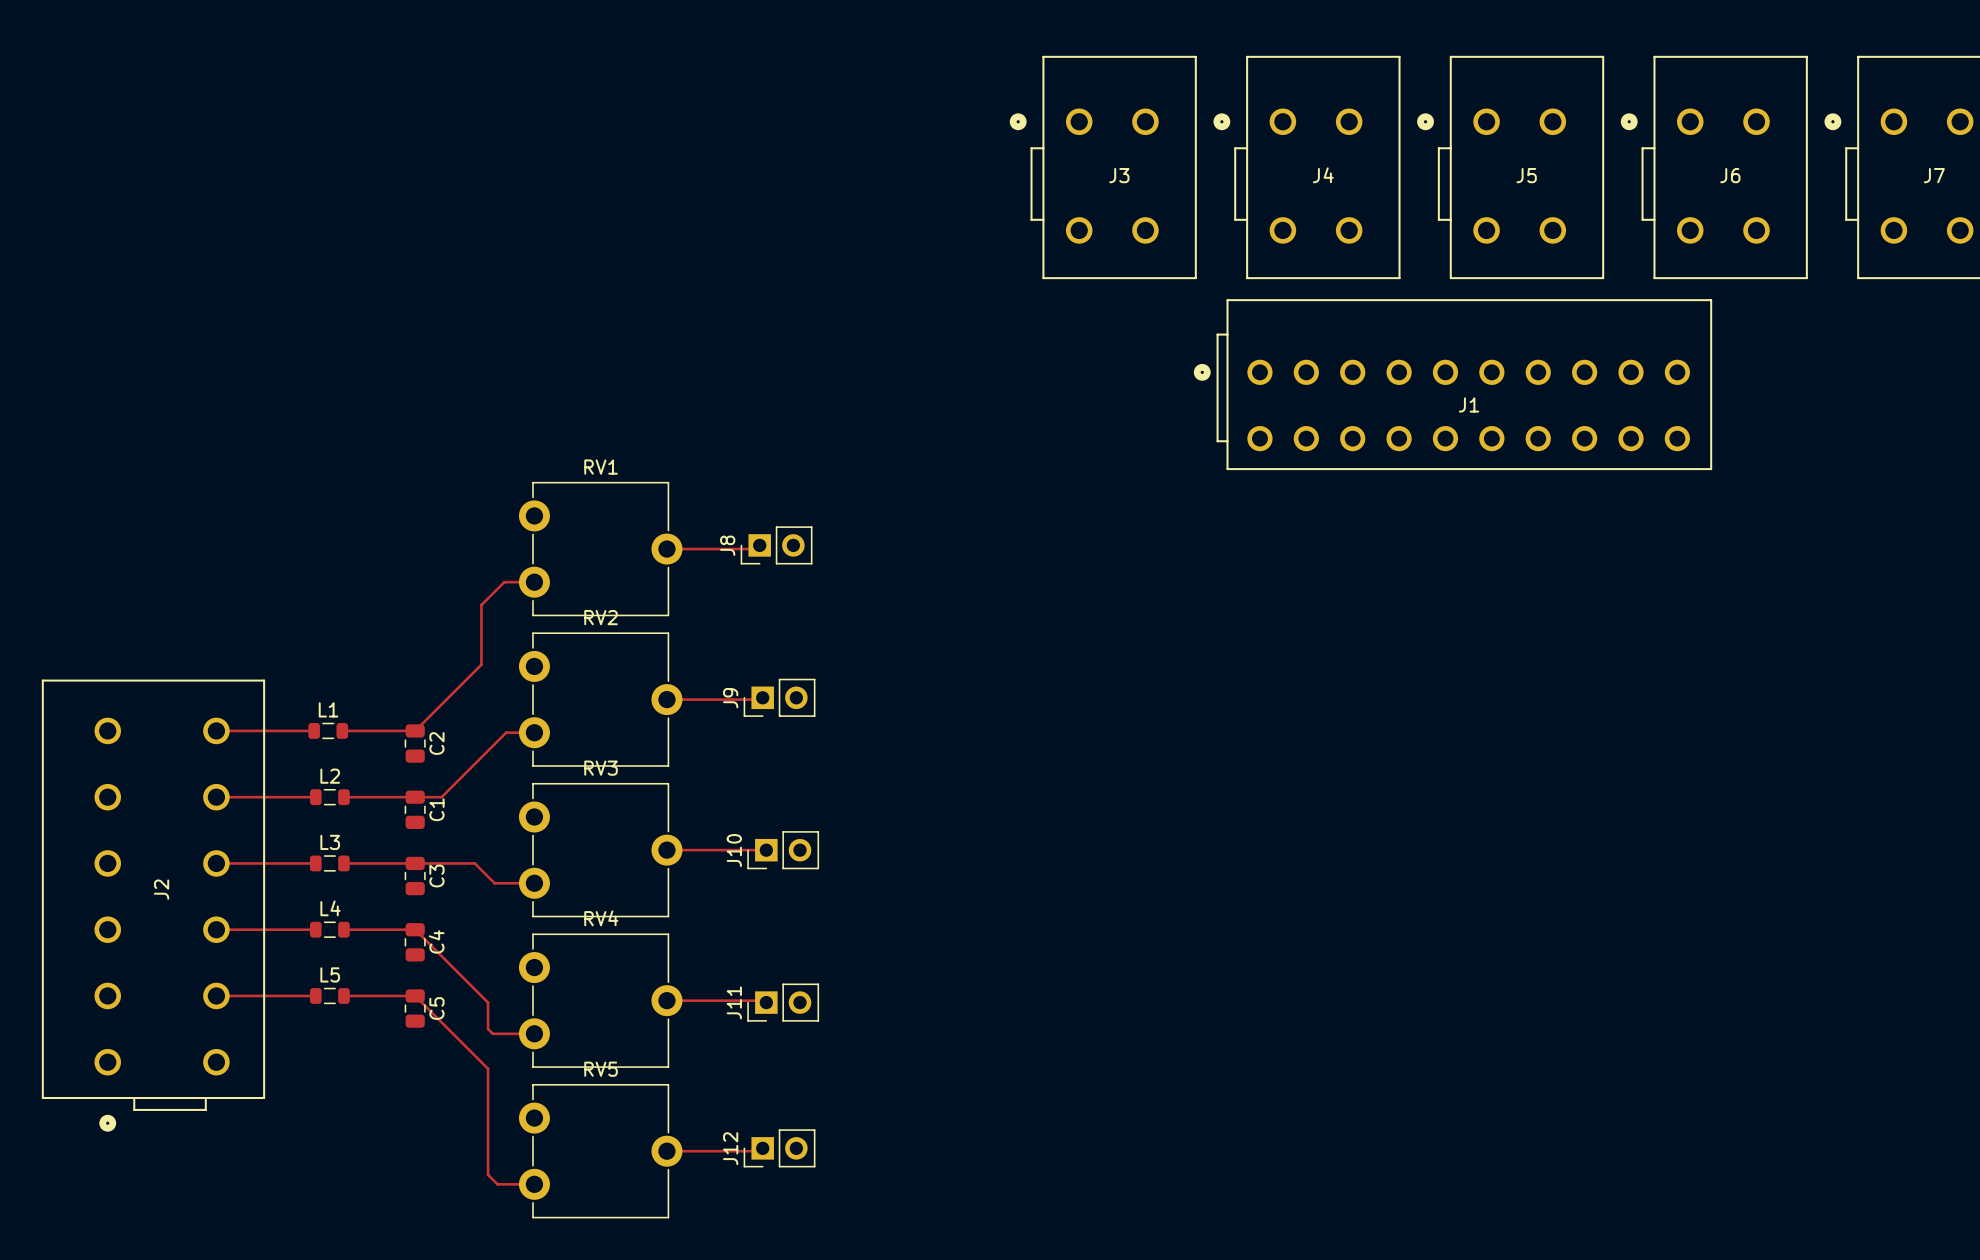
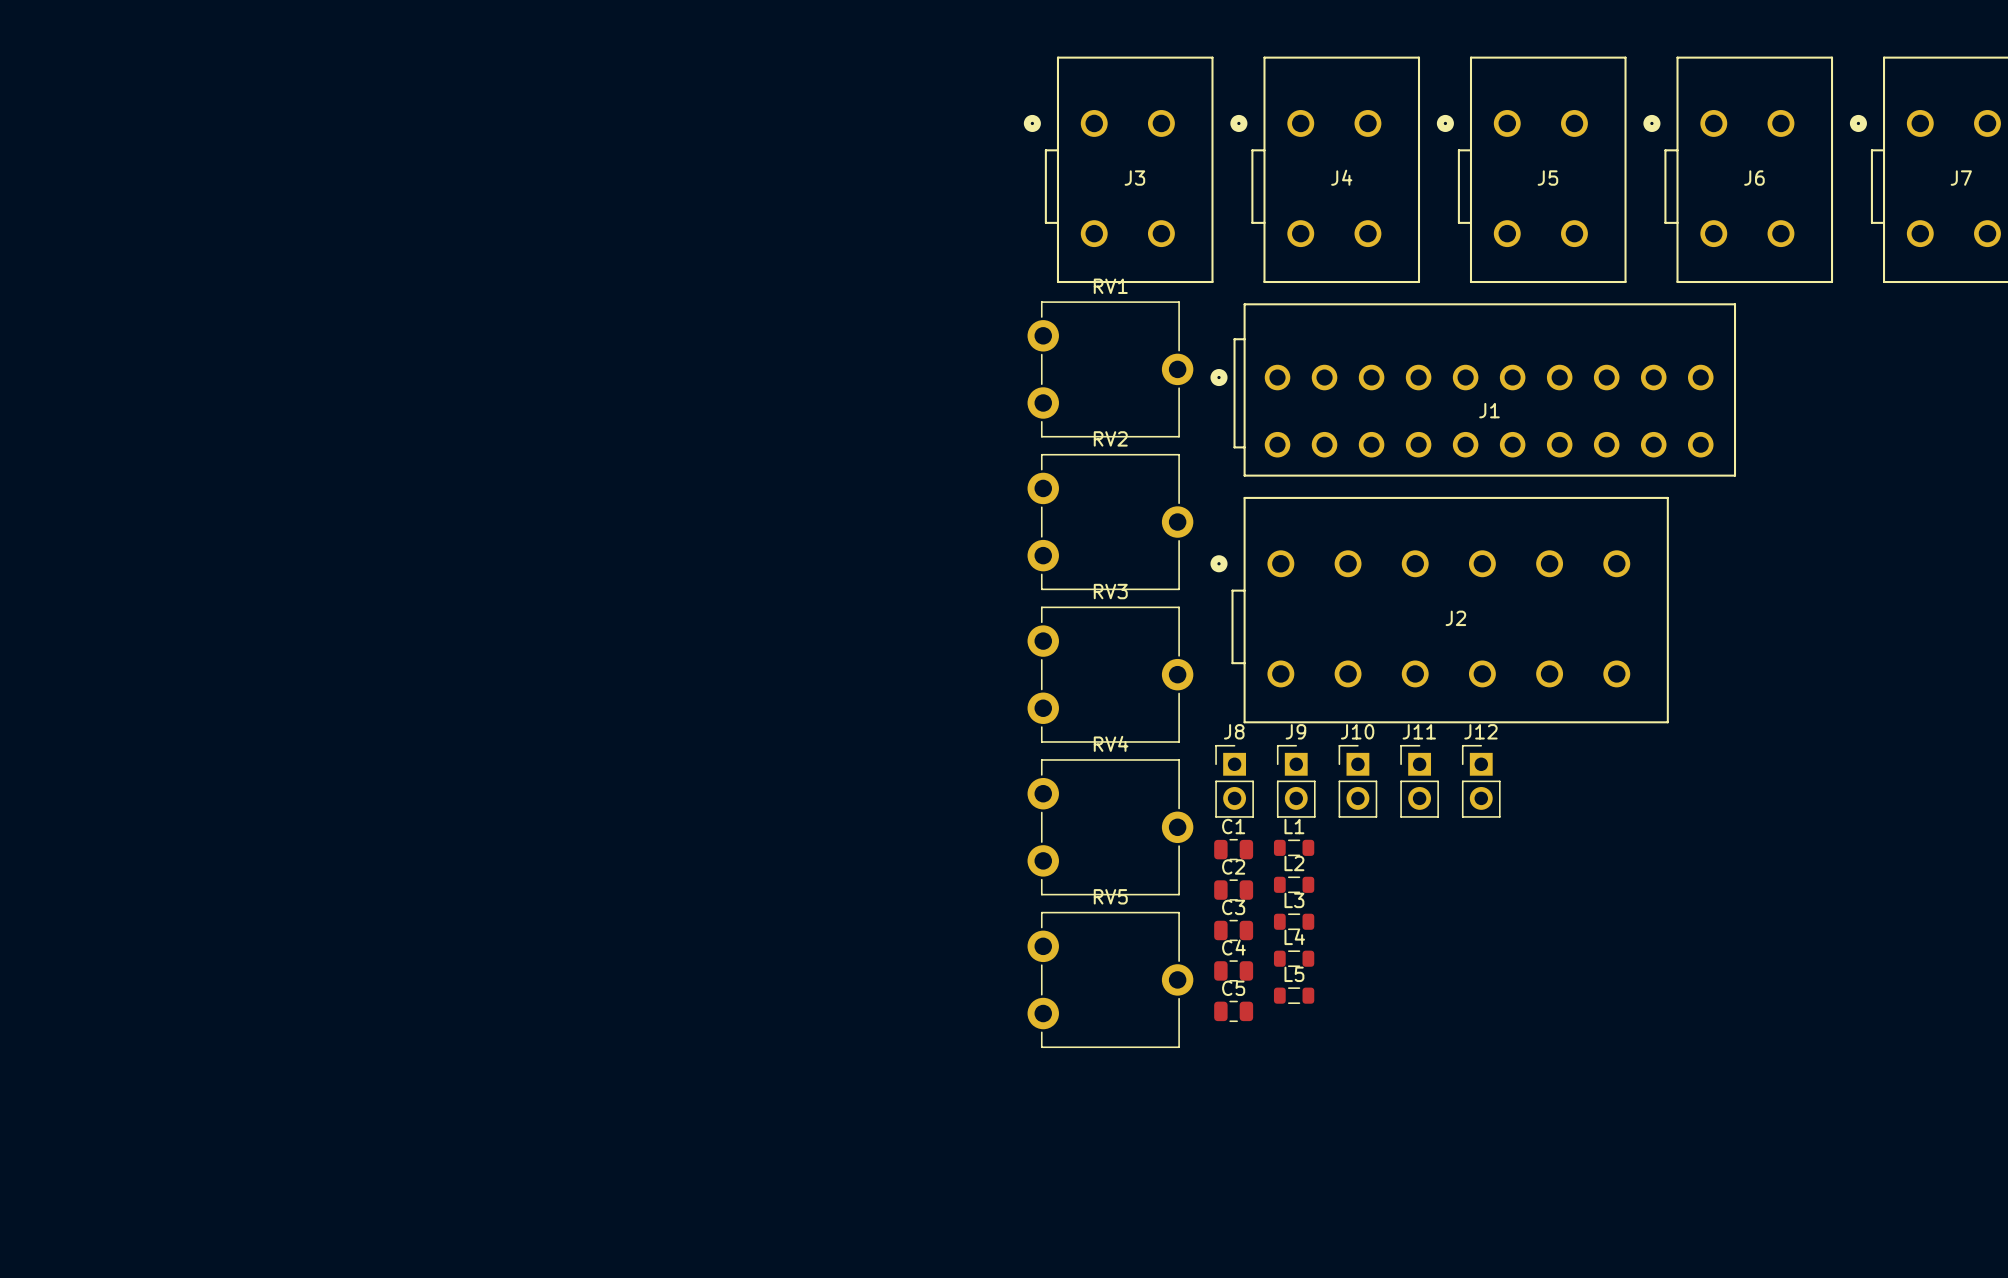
track: (759, 545) (756, 549) (666, 549) -> none
J8 rotation: 0° (776, 545) -> 90° clockwise (1234, 781)
J8 position: (776, 545) -> (1234, 781)
RV1 position: (600, 549) -> (1110, 369)
track: (534, 582) (504, 582) (481, 605) (481, 664) (415, 730) (342, 730) -> none
track: (762, 697) (760, 699) (666, 699) -> none
J9 rotation: 0° (779, 697) -> 90° clockwise (1296, 781)
J9 position: (779, 697) -> (1296, 781)
RV2 position: (600, 699) -> (1110, 522)
track: (216, 730) (314, 730) -> none
L1 position: (328, 730) -> (1294, 847)
track: (534, 732) (506, 732) (441, 797) (343, 797) -> none
C2 rotation: 0° (415, 743) -> 90° clockwise (1233, 890)
C2 position: (415, 743) -> (1233, 890)
C2 name position: C2 (436, 743) -> C2 (1233, 866)
track: (216, 797) (315, 797) -> none
L2 position: (329, 797) -> (1294, 884)
C1 rotation: 0° (415, 809) -> 90° clockwise (1233, 849)
C1 position: (415, 809) -> (1233, 849)
C1 name position: C1 (436, 809) -> C1 (1233, 826)
RV3 position: (600, 850) -> (1110, 674)
track: (666, 850) (766, 850) -> none
J10 rotation: 0° (783, 850) -> 90° clockwise (1357, 781)
J10 position: (783, 850) -> (1357, 781)
track: (216, 863) (315, 863) -> none
L3 position: (329, 863) -> (1294, 921)
track: (343, 863) (474, 863) (494, 883) (534, 883) -> none
C3 rotation: 0° (415, 876) -> 90° clockwise (1233, 930)
C3 position: (415, 876) -> (1233, 930)
C3 name position: C3 (436, 876) -> C3 (1233, 907)
J2 rotation: 0° (153, 905) -> 90° clockwise (1439, 610)
J2 position: (153, 905) -> (1439, 610)
track: (216, 929) (315, 929) -> none
L4 position: (329, 929) -> (1294, 958)
track: (343, 929) (415, 929) (488, 1002) (488, 1029) (492, 1033) (534, 1033) -> none
C4 name position: C4 (436, 941) -> C4 (1233, 947)
C4 rotation: 0° (415, 942) -> 90° clockwise (1233, 970)
C4 position: (415, 942) -> (1233, 970)
track: (216, 995) (315, 995) -> none
L5 position: (329, 995) -> (1294, 995)
track: (343, 995) (415, 995) (488, 1068) (488, 1174) (497, 1184) (534, 1184) -> none
RV4 position: (600, 1000) -> (1110, 827)
track: (666, 1000) (764, 1000) (766, 1002) -> none
J11 rotation: 0° (783, 1002) -> 90° clockwise (1419, 781)
J11 position: (783, 1002) -> (1419, 781)
C5 rotation: 0° (415, 1008) -> 90° clockwise (1233, 1011)
C5 position: (415, 1008) -> (1233, 1011)
C5 name position: C5 (436, 1008) -> C5 (1233, 988)
track: (762, 1148) (759, 1151) (666, 1151) -> none
J12 rotation: 0° (779, 1148) -> 90° clockwise (1481, 781)
J12 position: (779, 1148) -> (1481, 781)
RV5 position: (600, 1151) -> (1110, 979)

